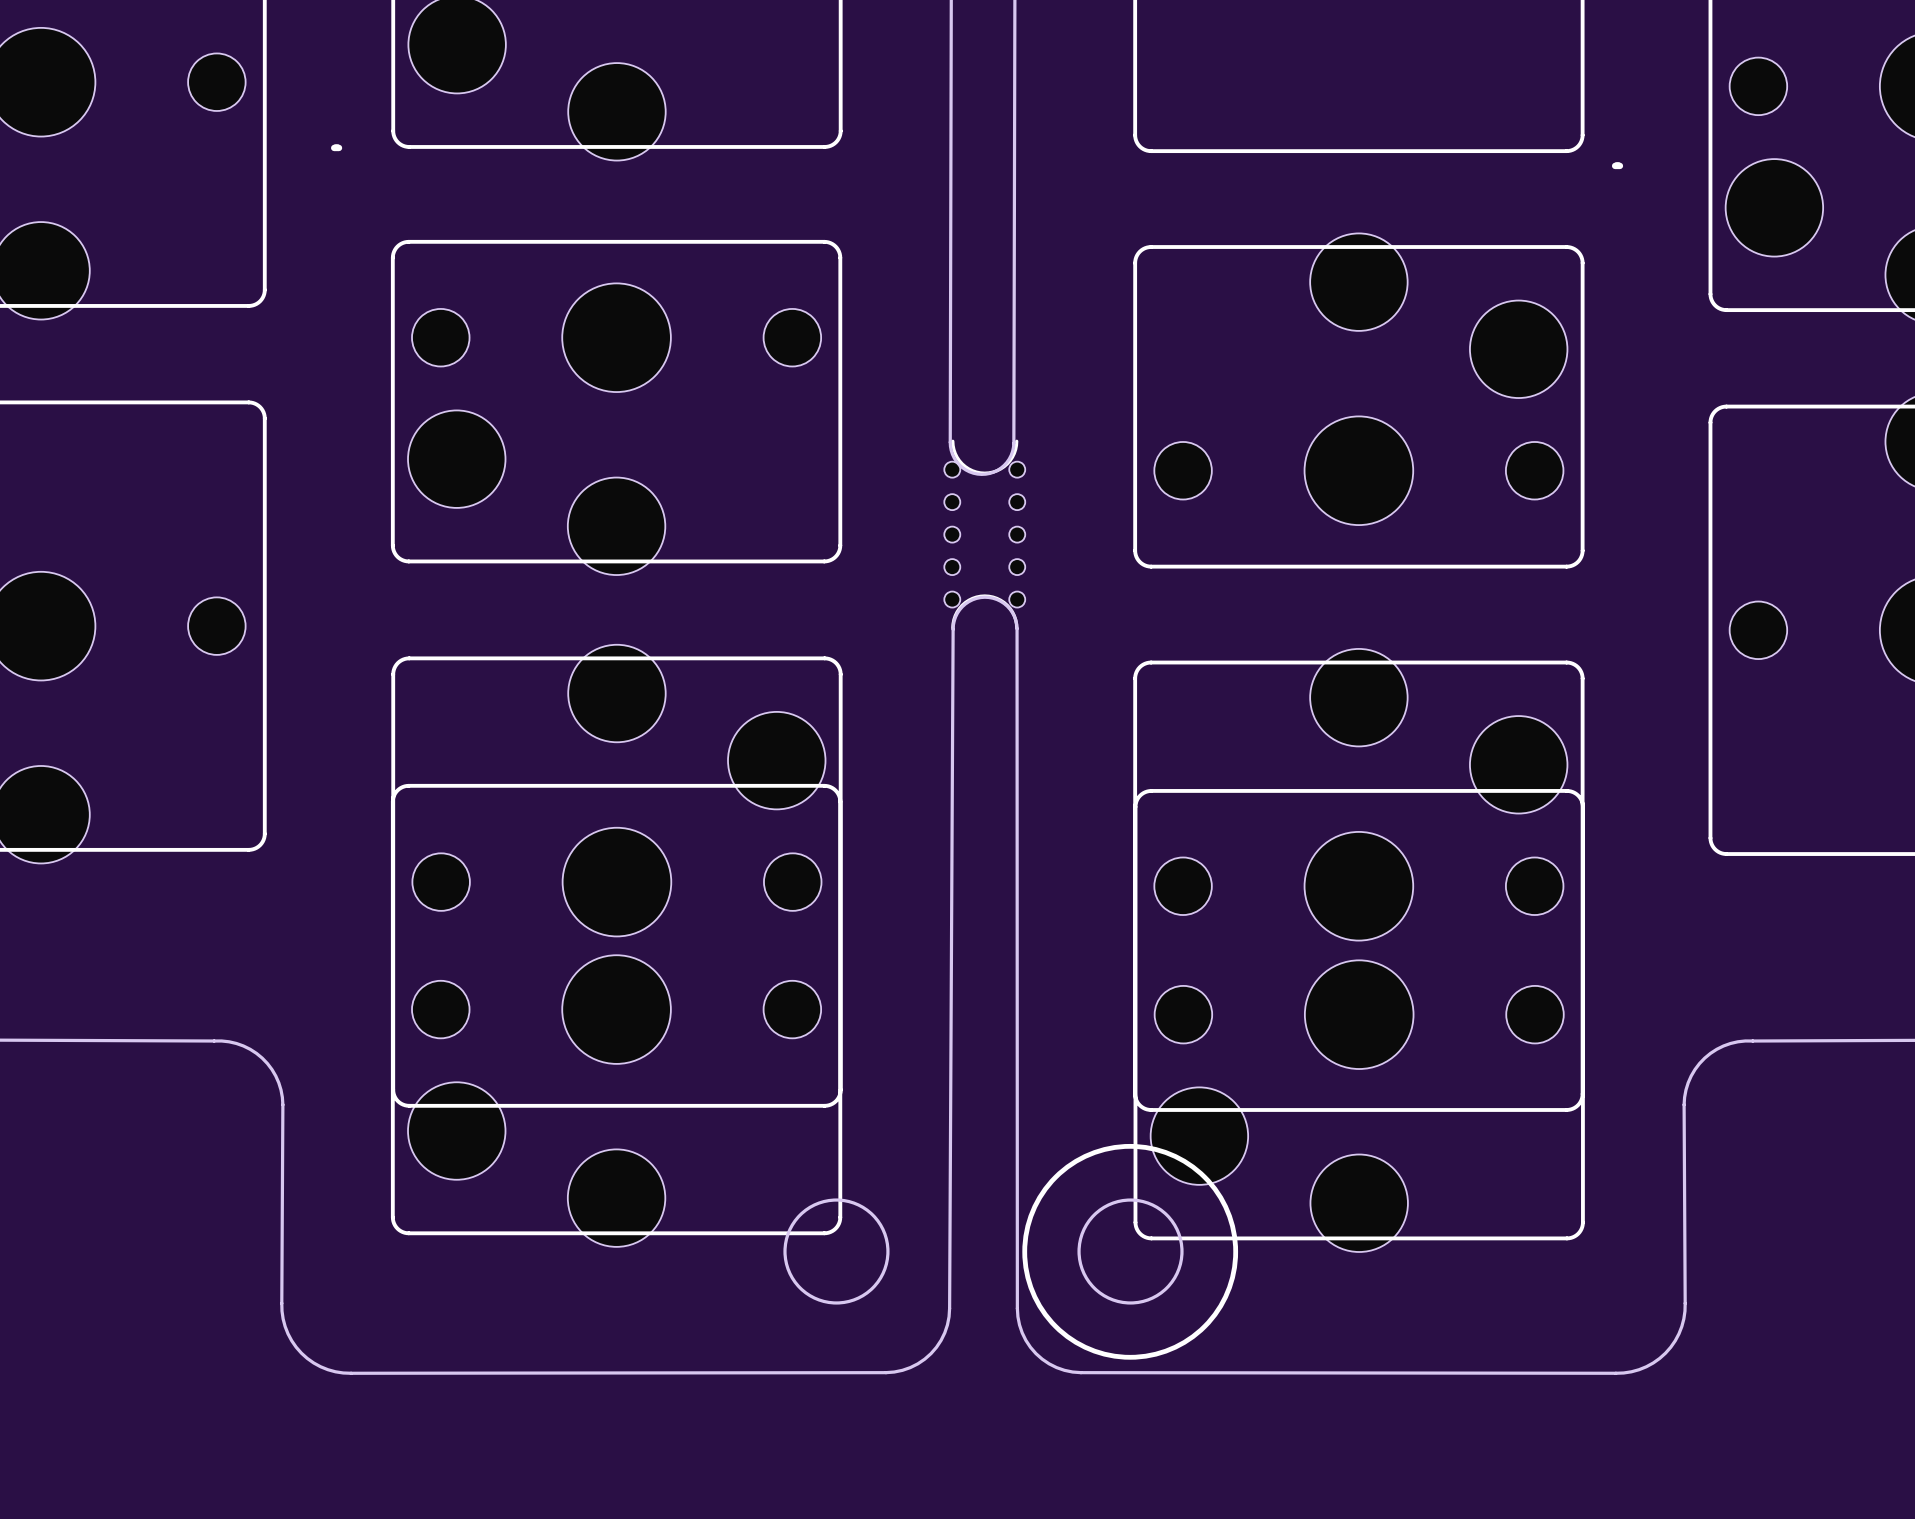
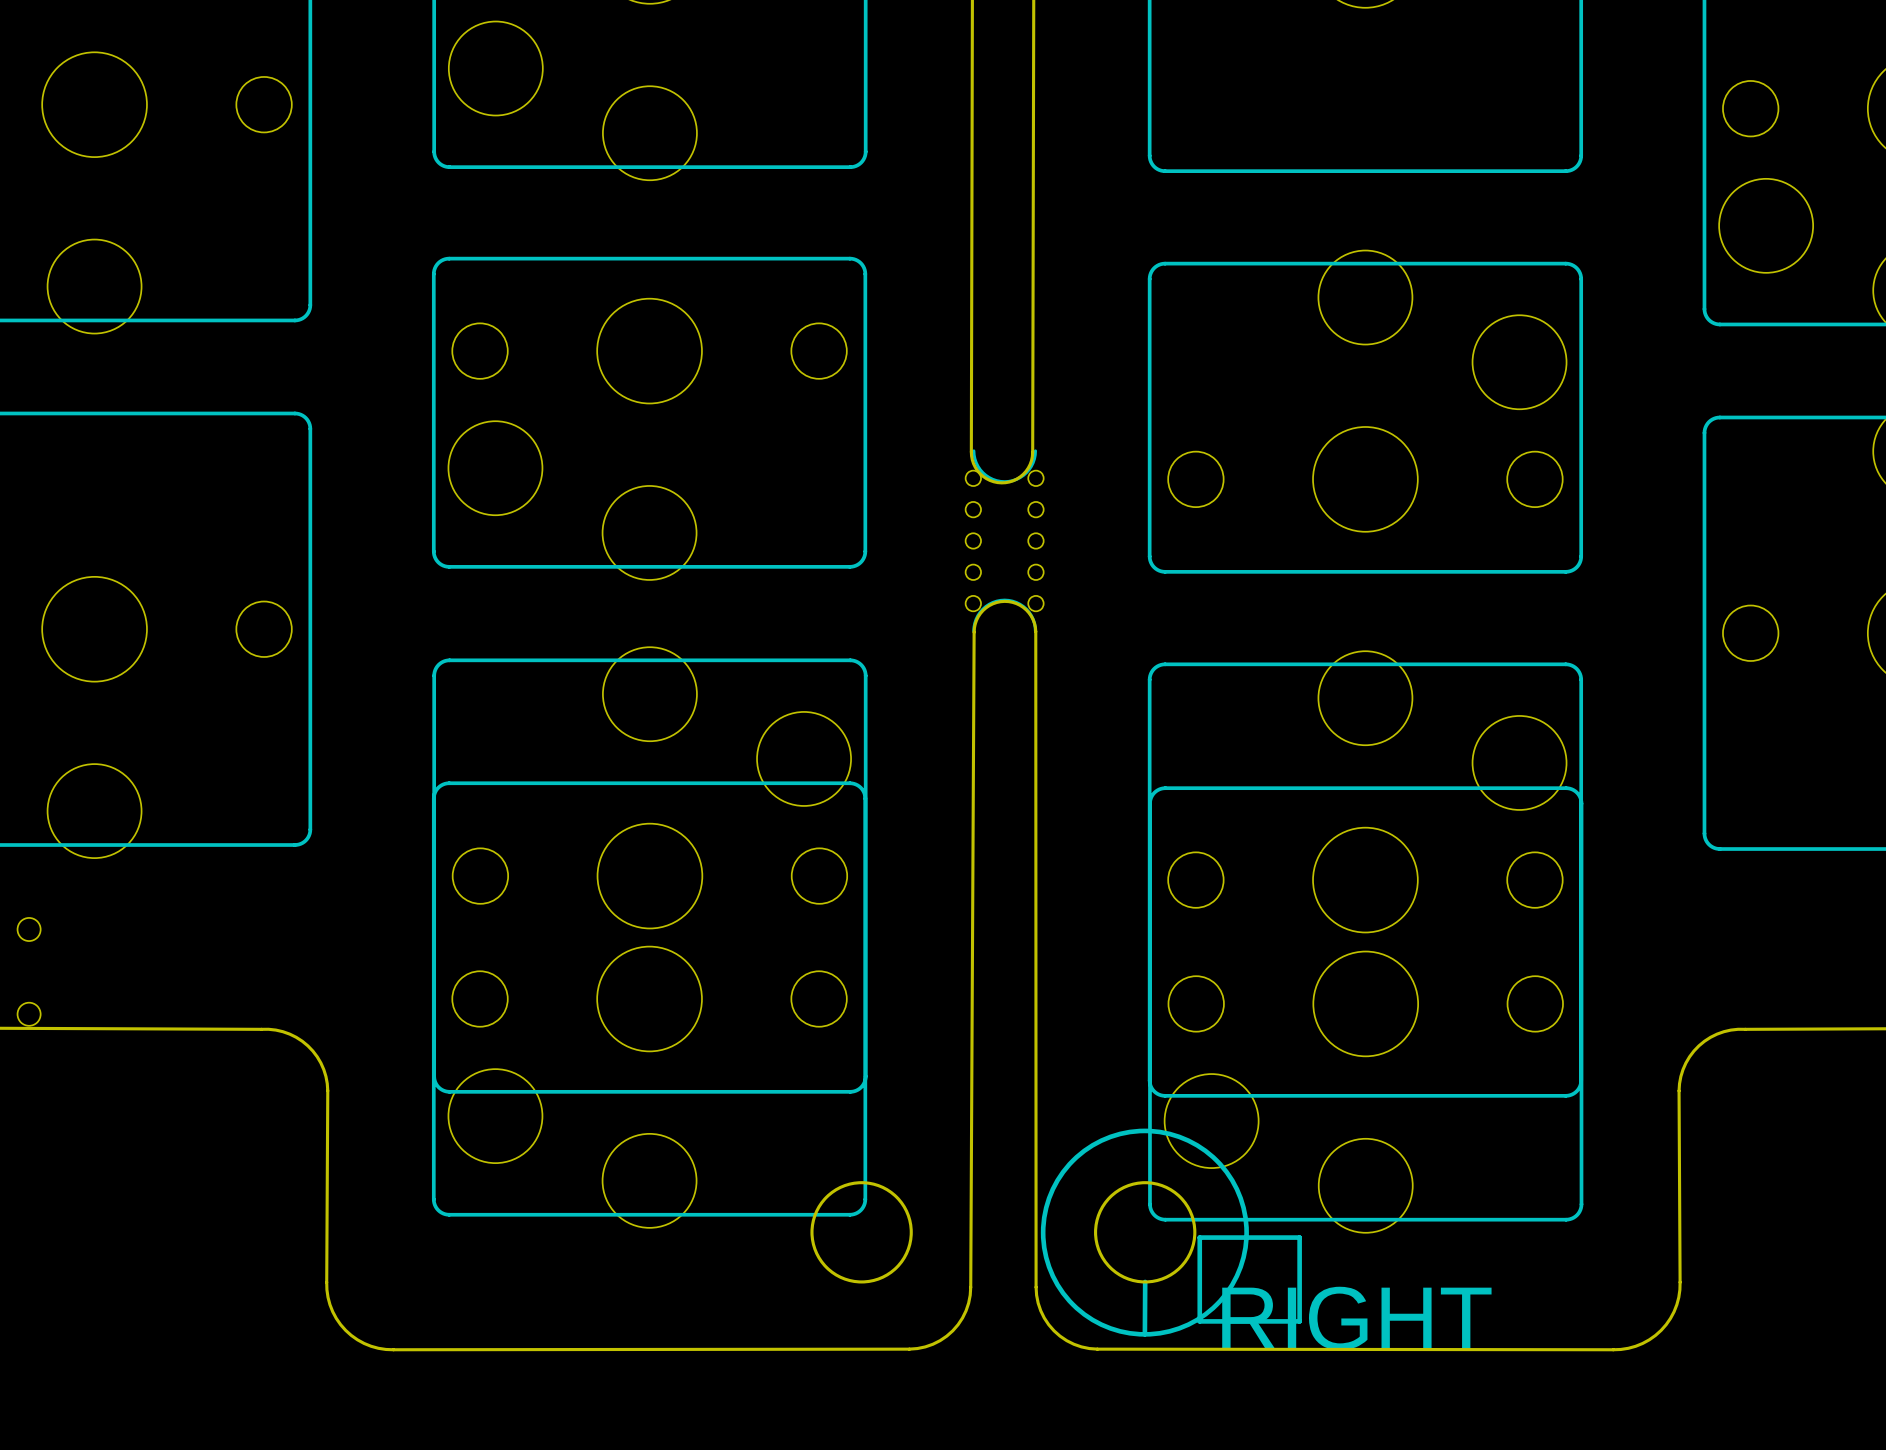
drawing: [331, 144, 343, 152] -> none
drawing: [1611, 162, 1624, 170] -> none
line: none -> (1199, 1237) (1299, 1237) (1299, 1321) (1199, 1321) (1199, 1237)
line: none -> (1145, 1281) (1144, 1334)
text: none -> RIGHT (1356, 1318)

